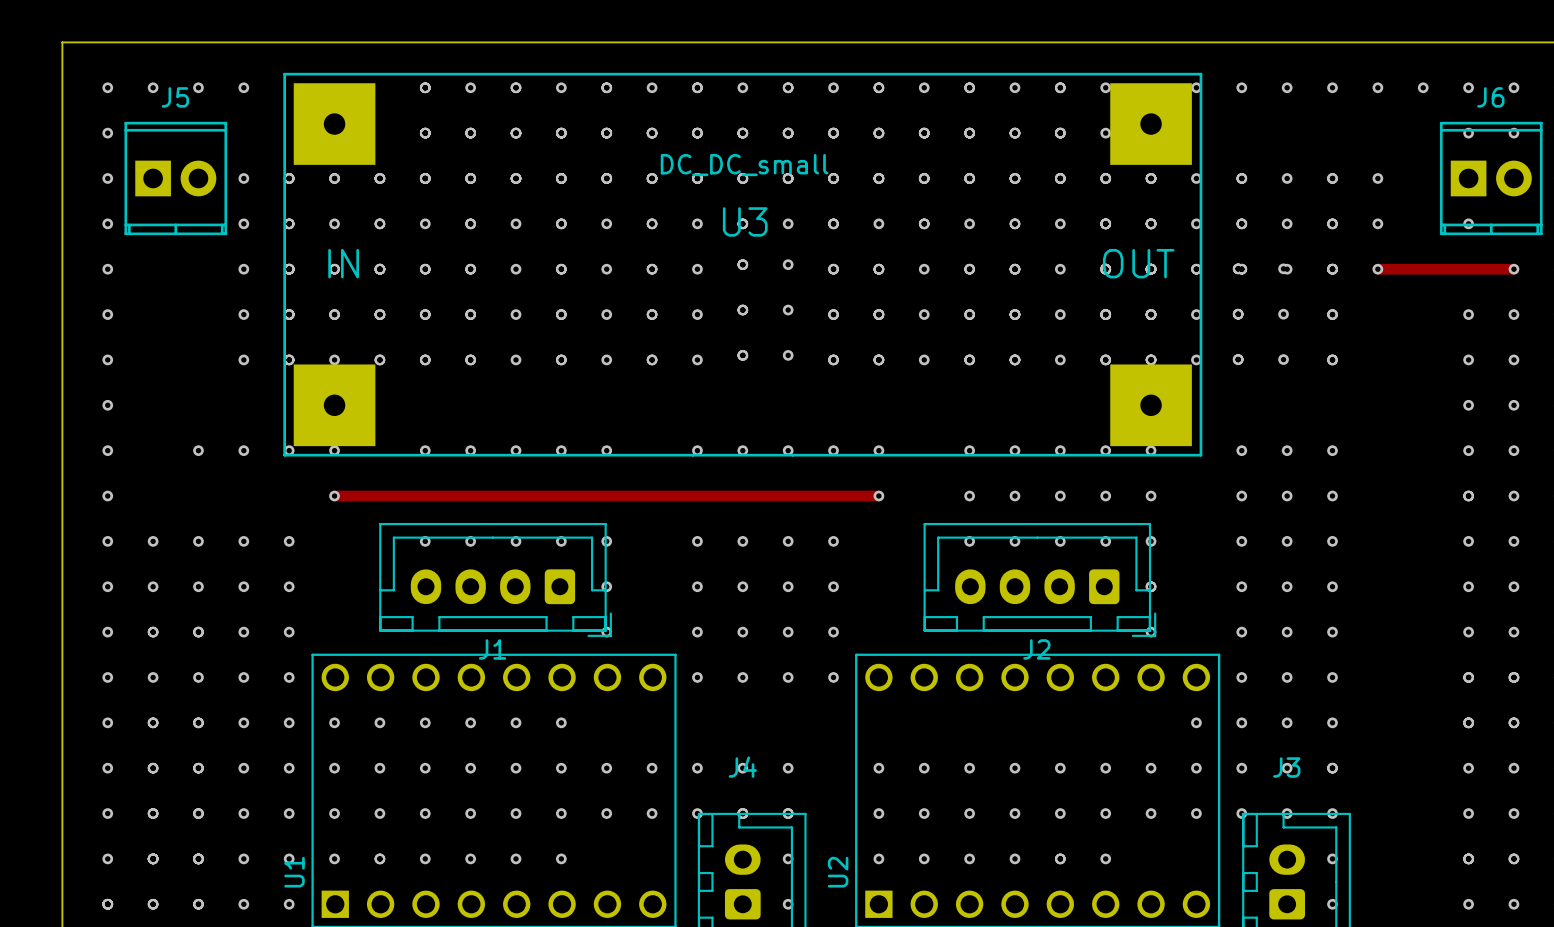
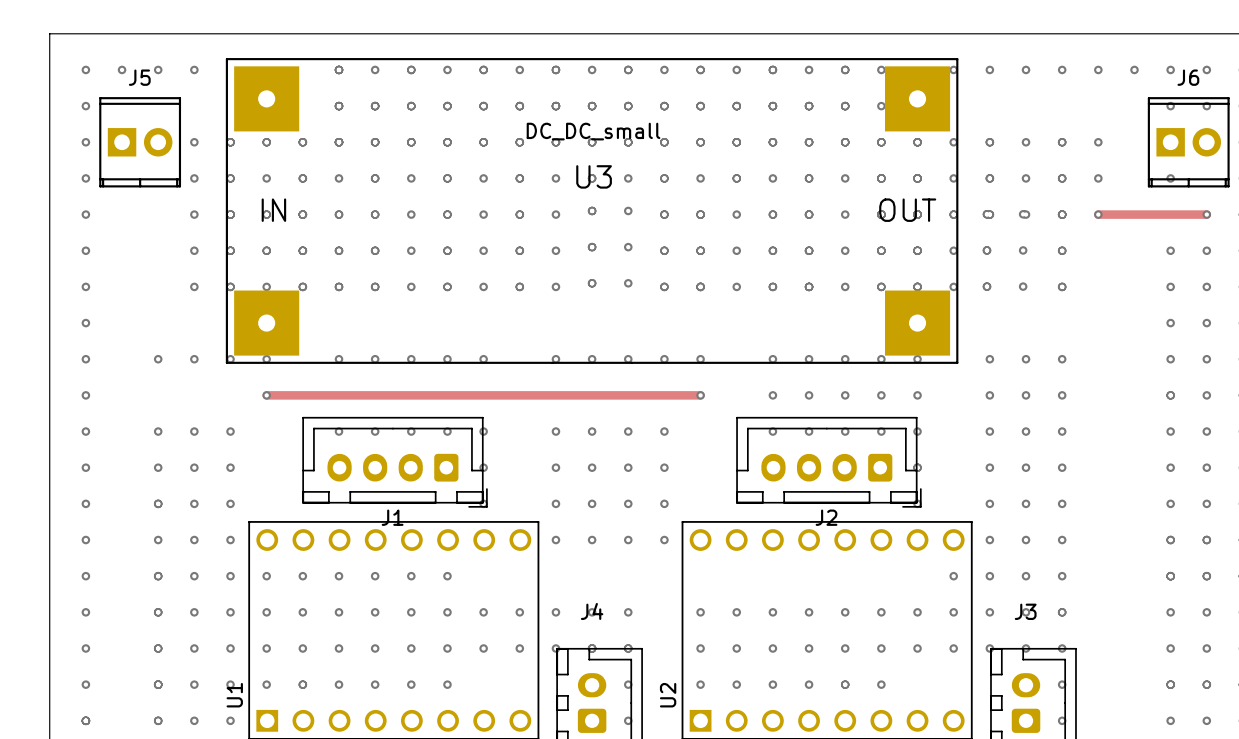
via: (153, 541) -> none
via: (153, 586) -> none
via: (153, 632) -> none
via: (153, 677) -> none
via: (153, 722) -> none
via: (153, 768) -> none
via: (153, 813) -> none
via: (153, 858) -> none
via: (153, 904) -> none

